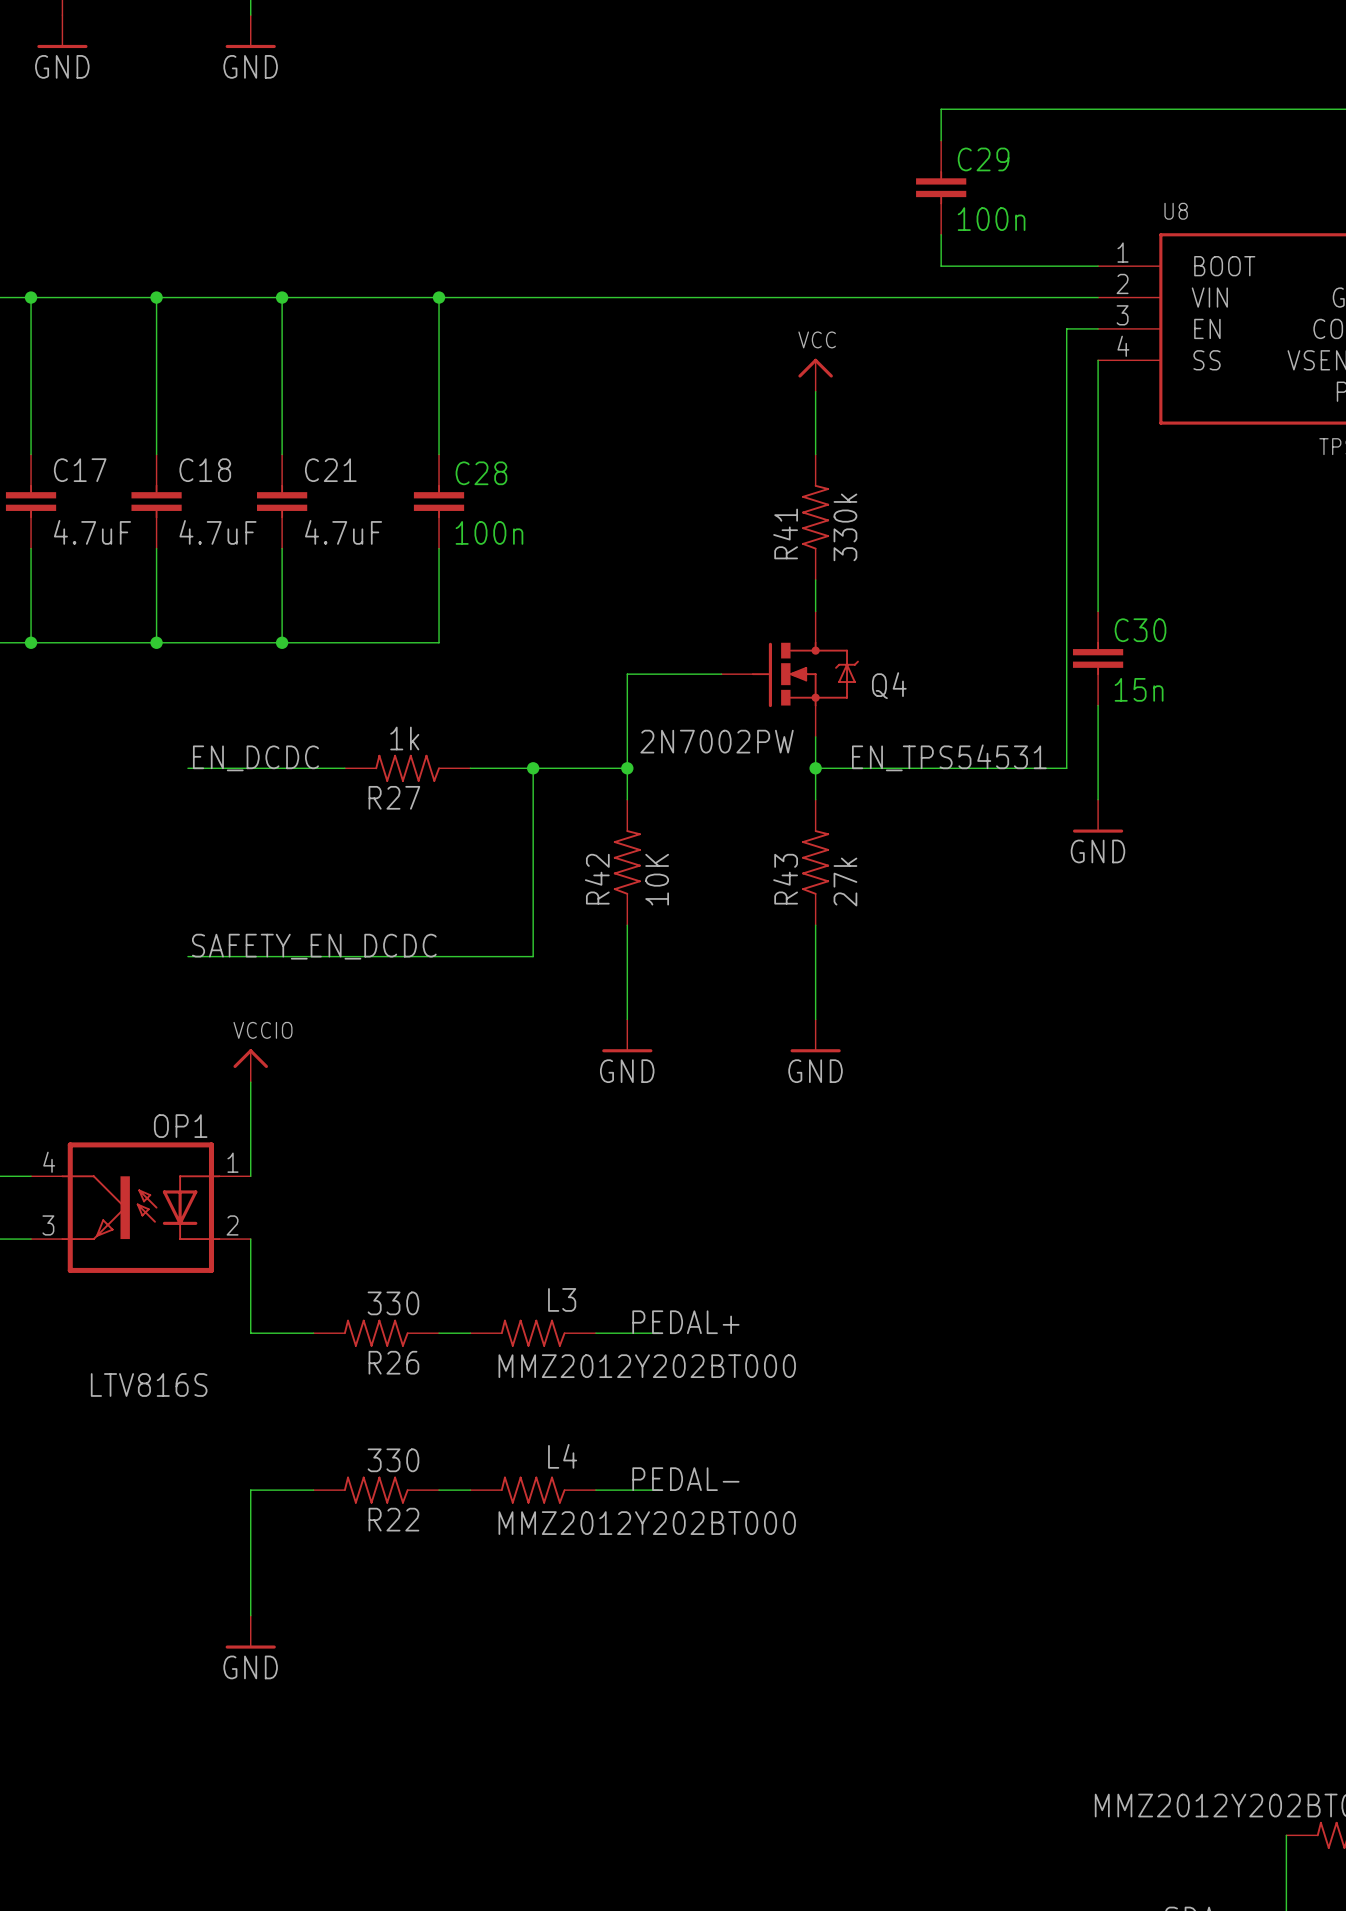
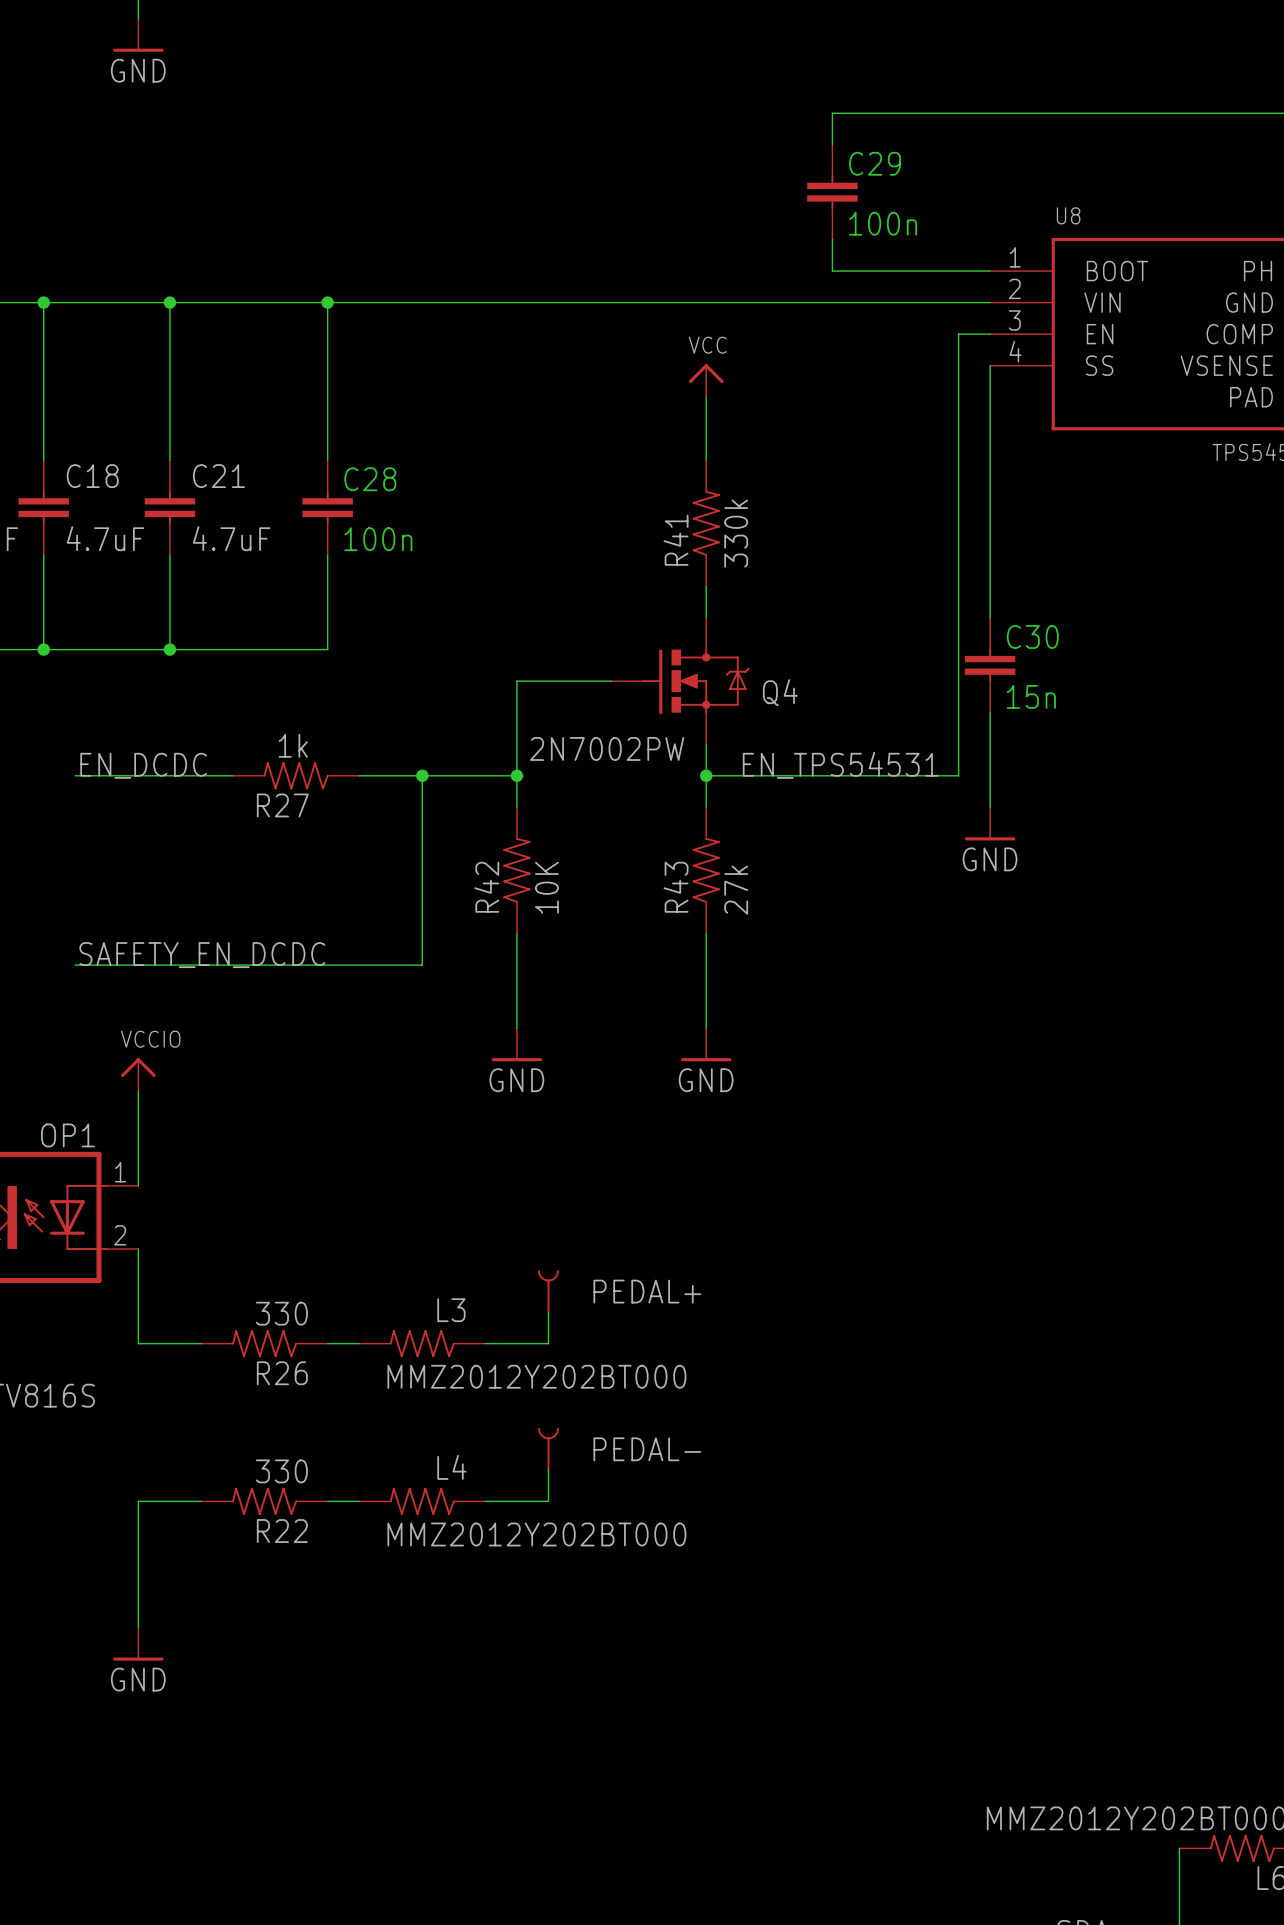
PEDAL+: none -> (548, 1291)
wire: none -> (548, 1312) (548, 1343)
label: PEDAL+ (685, 1322) -> none
PEDAL-: none -> (548, 1449)
wire: none -> (548, 1469) (548, 1501)
label: PEDAL- (685, 1479) -> none

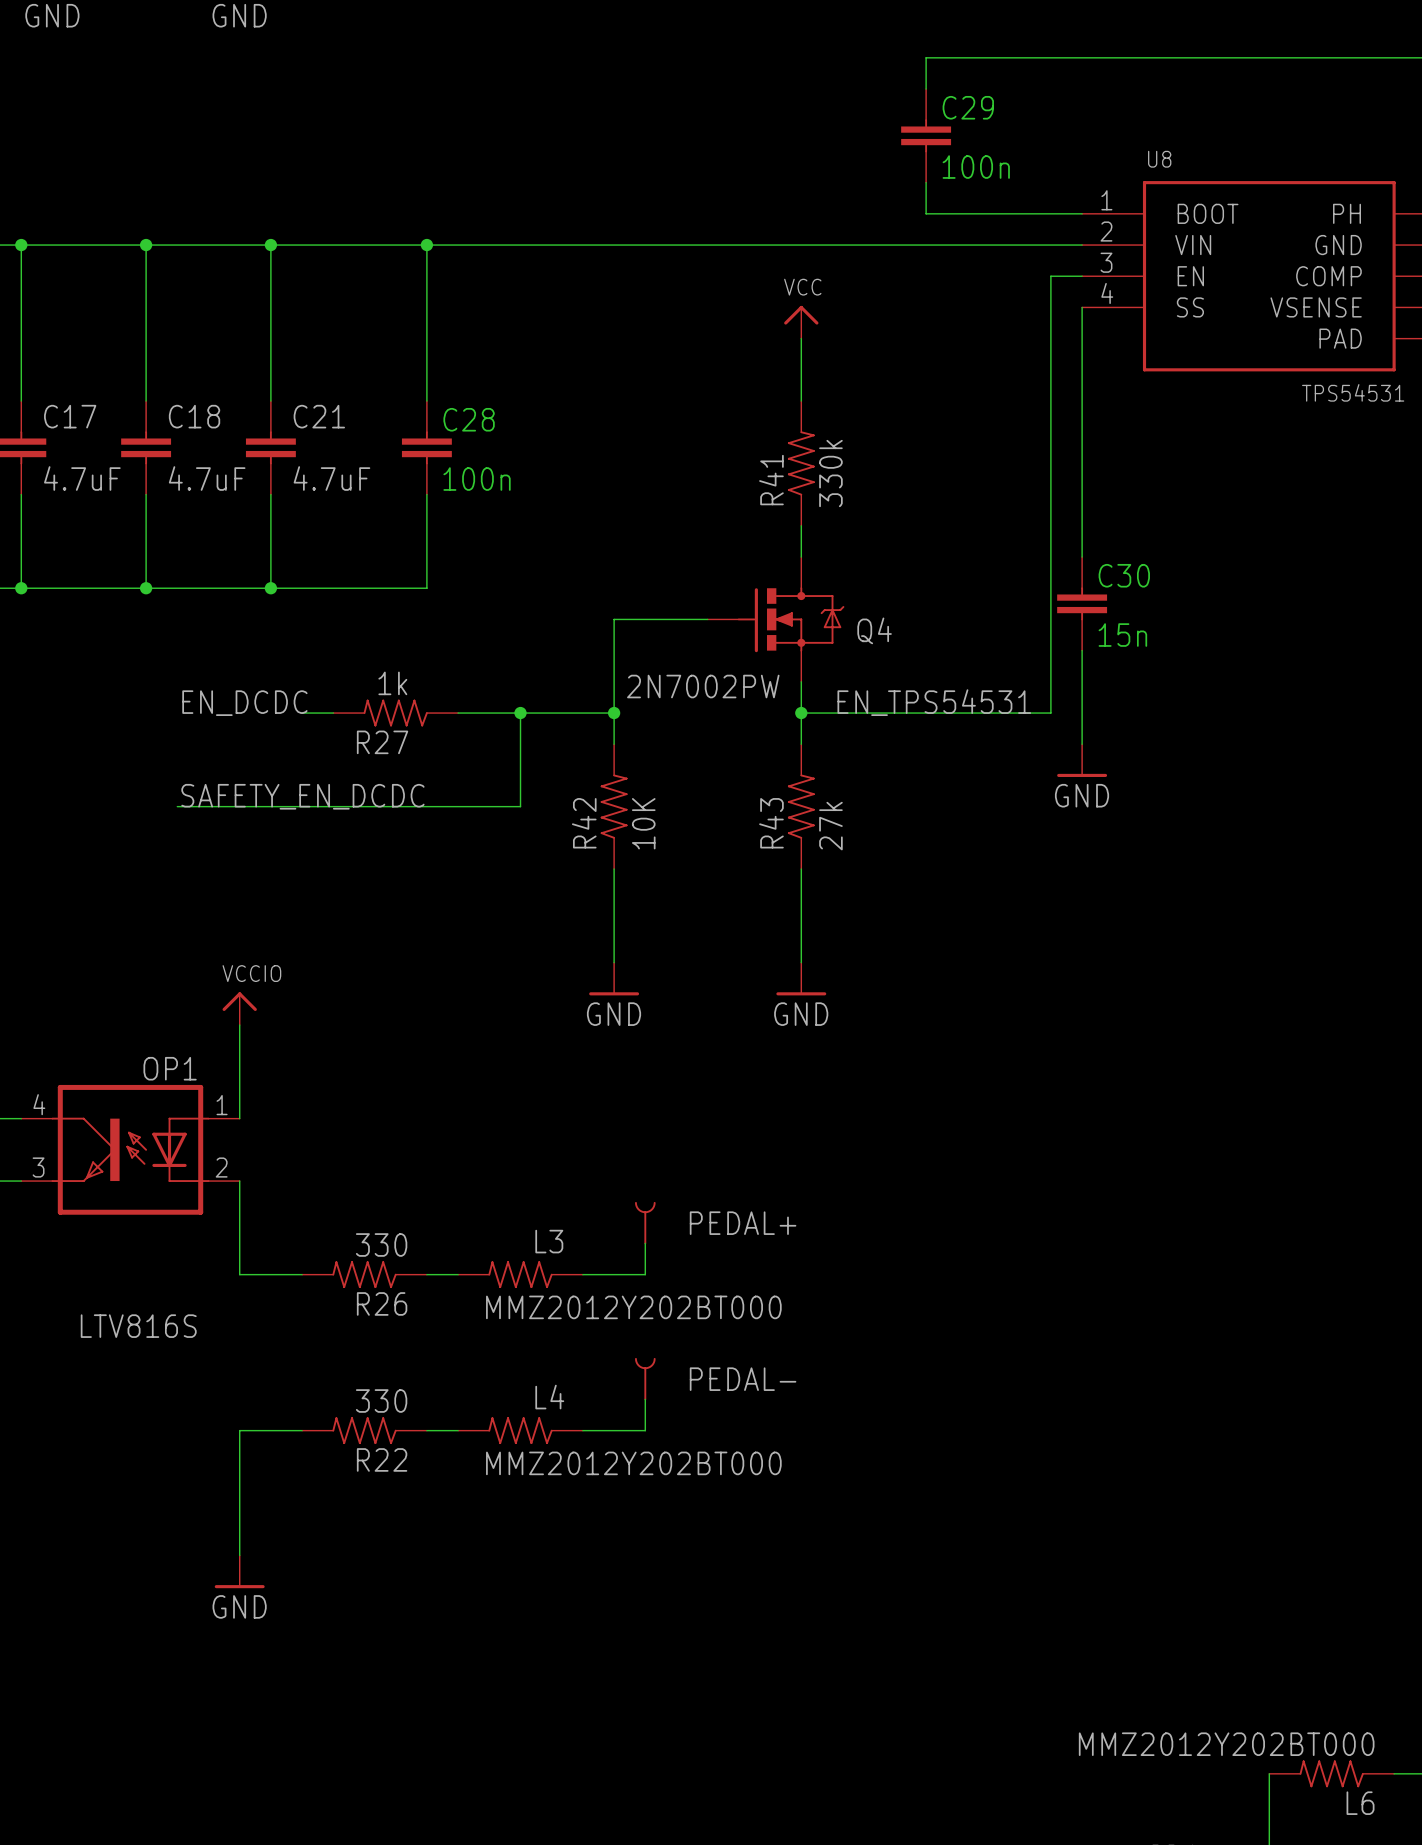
wire: (75, 775) (201, 775) -> none
wire: (422, 870) (422, 965) (75, 965) -> (520, 806) (177, 806)
label position: SAFETY_EN_DCDC (202, 955) -> SAFETY_EN_DCDC (302, 796)

